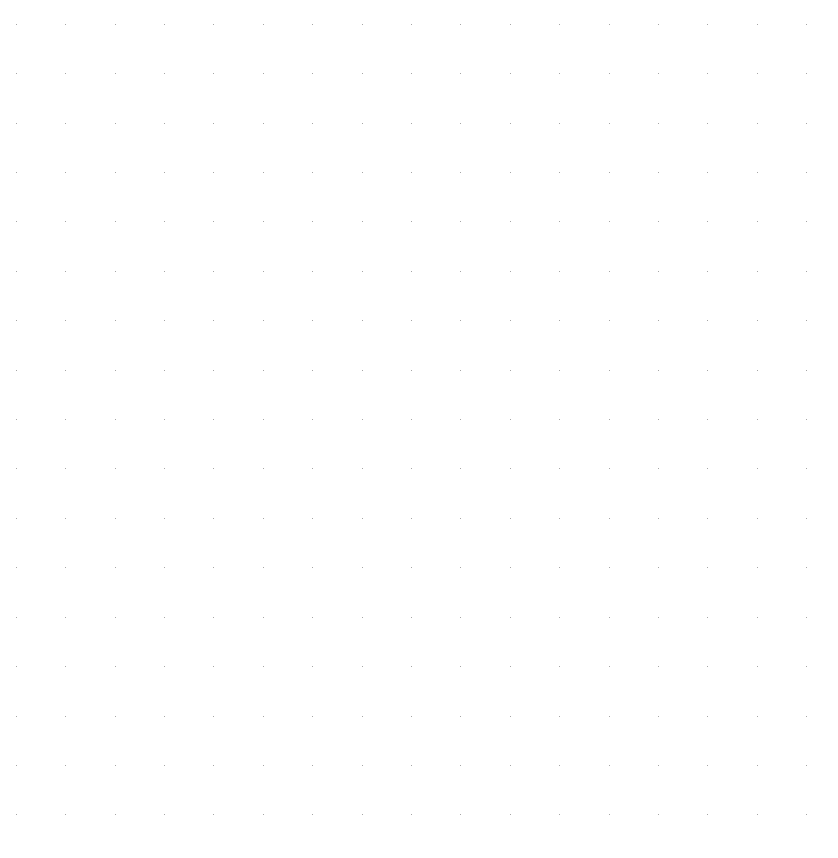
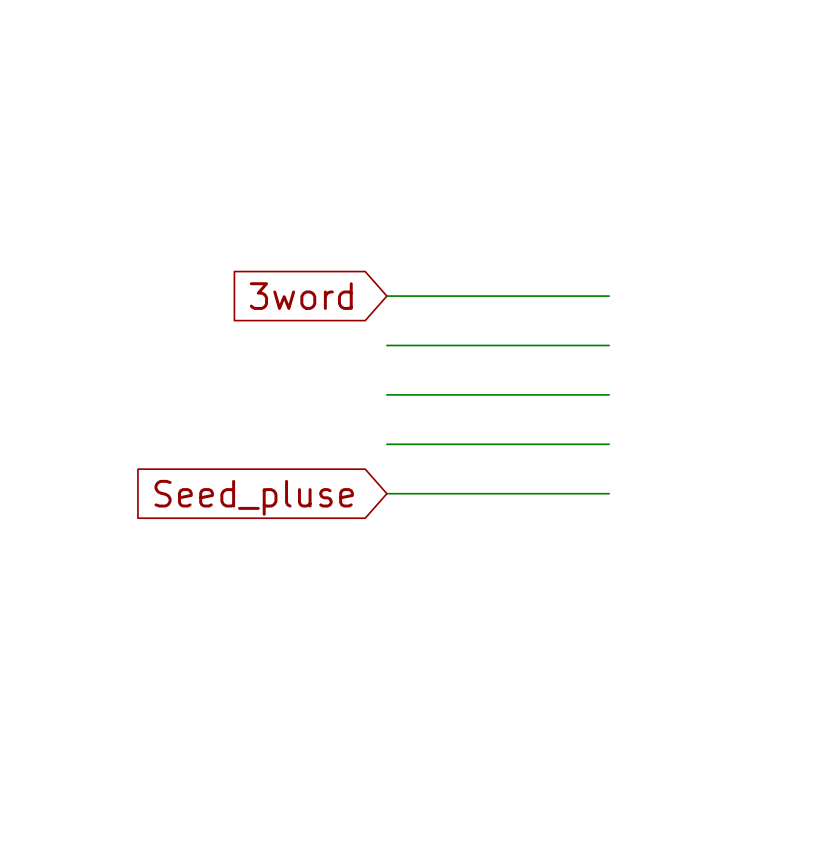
global label: none -> 3word (301, 296)
wire: none -> (386, 296) (609, 296)
wire: none -> (386, 345) (609, 345)
wire: none -> (386, 394) (609, 394)
wire: none -> (386, 444) (609, 444)
wire: none -> (386, 493) (609, 493)
global label: none -> Seed_pluse (254, 497)

